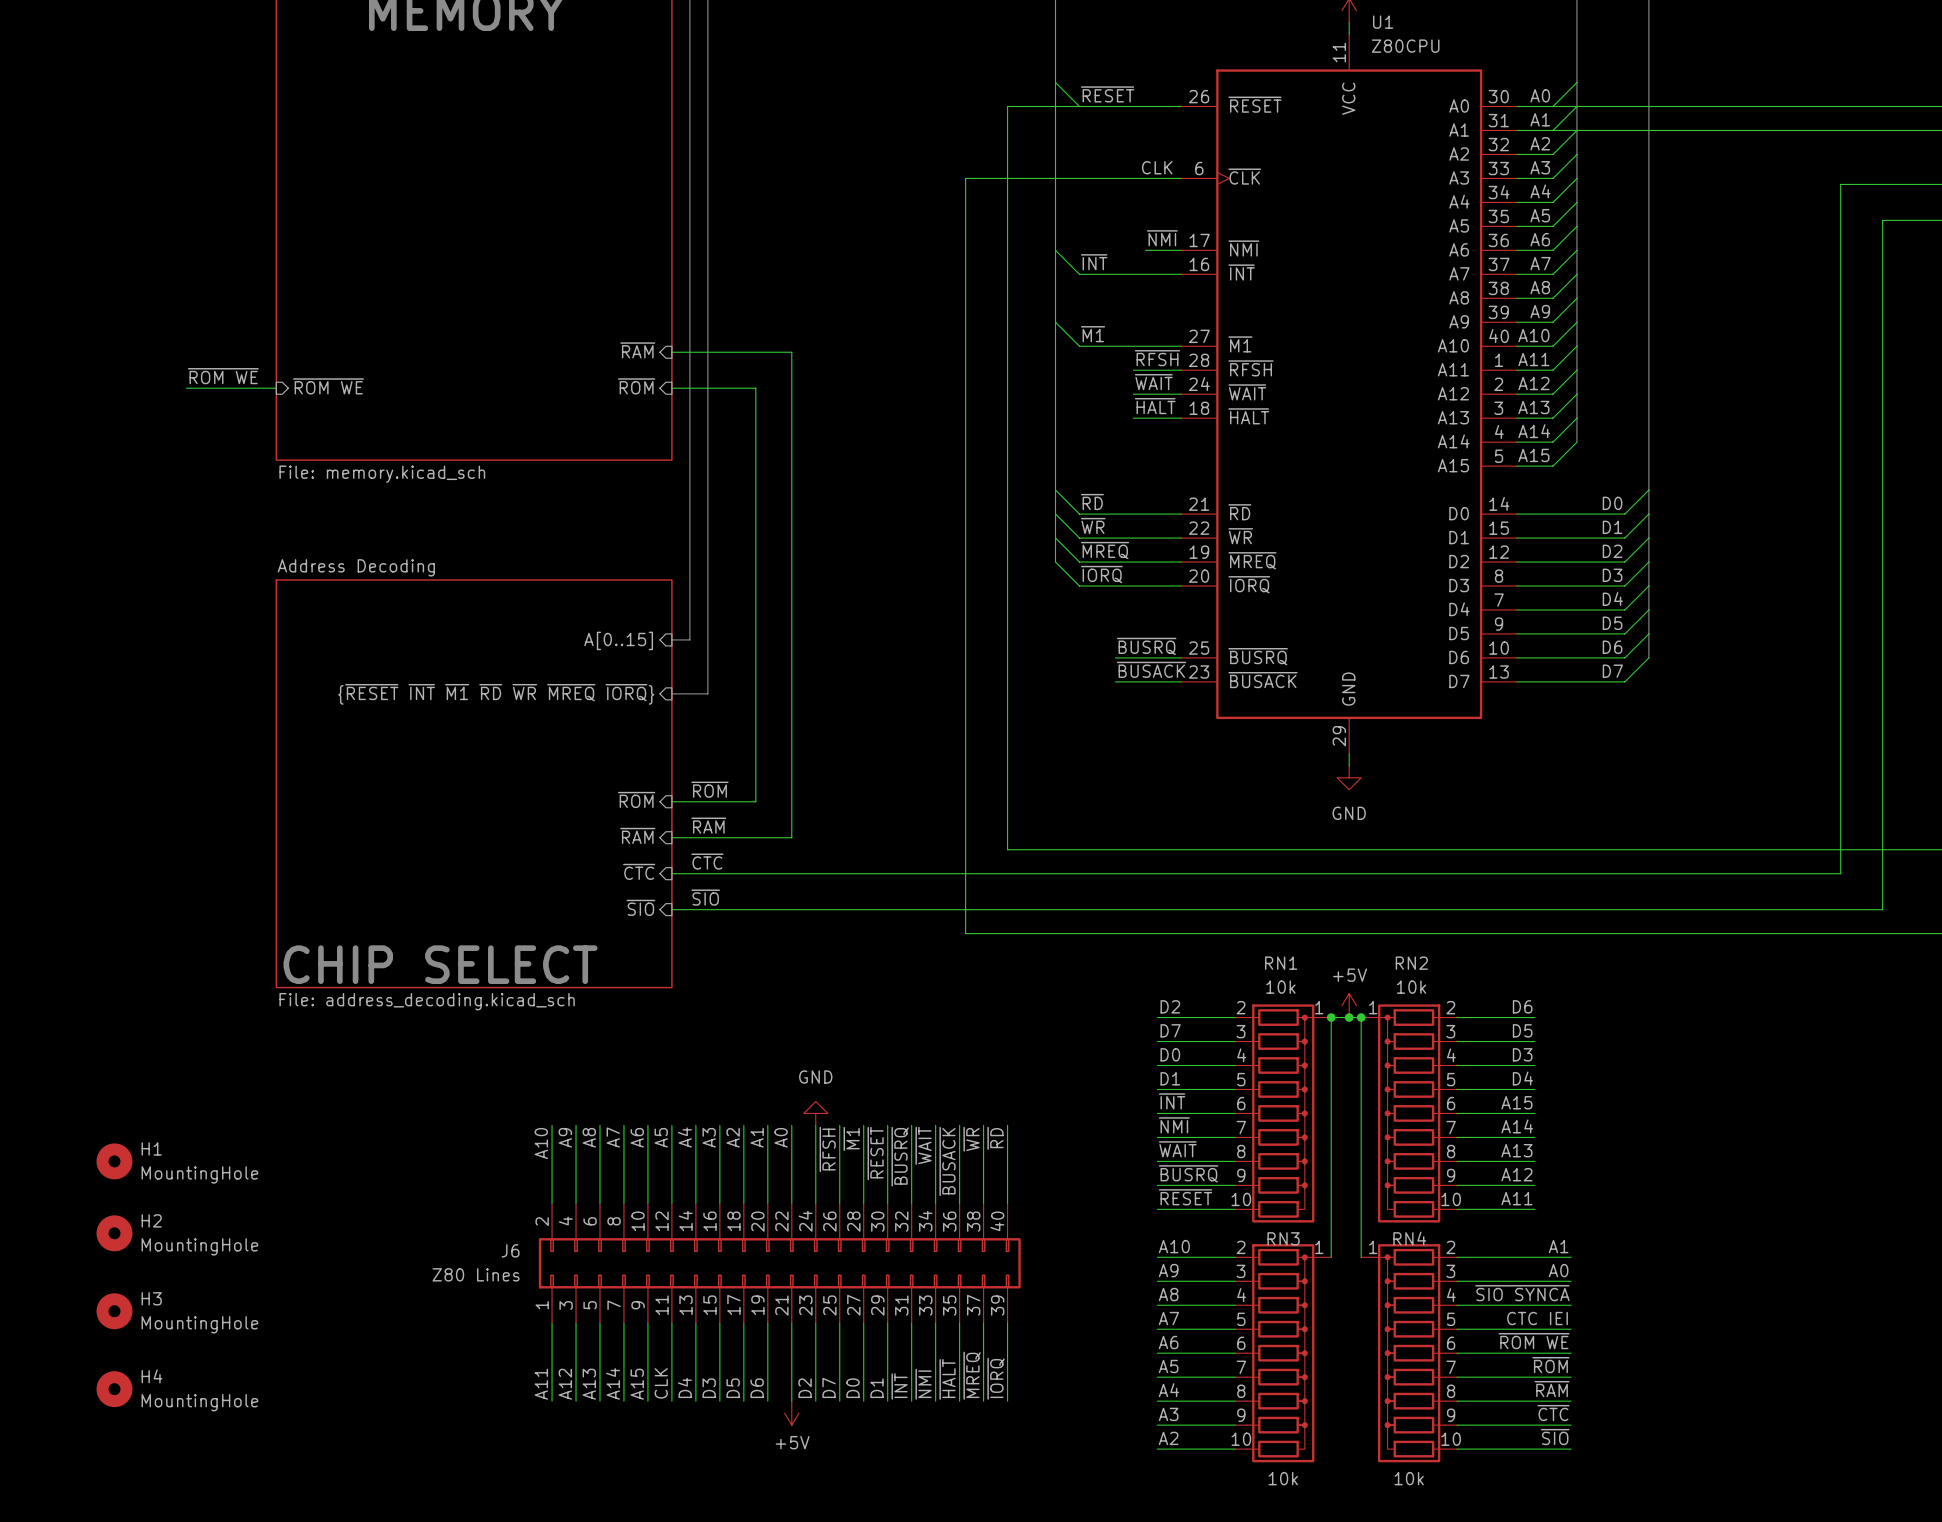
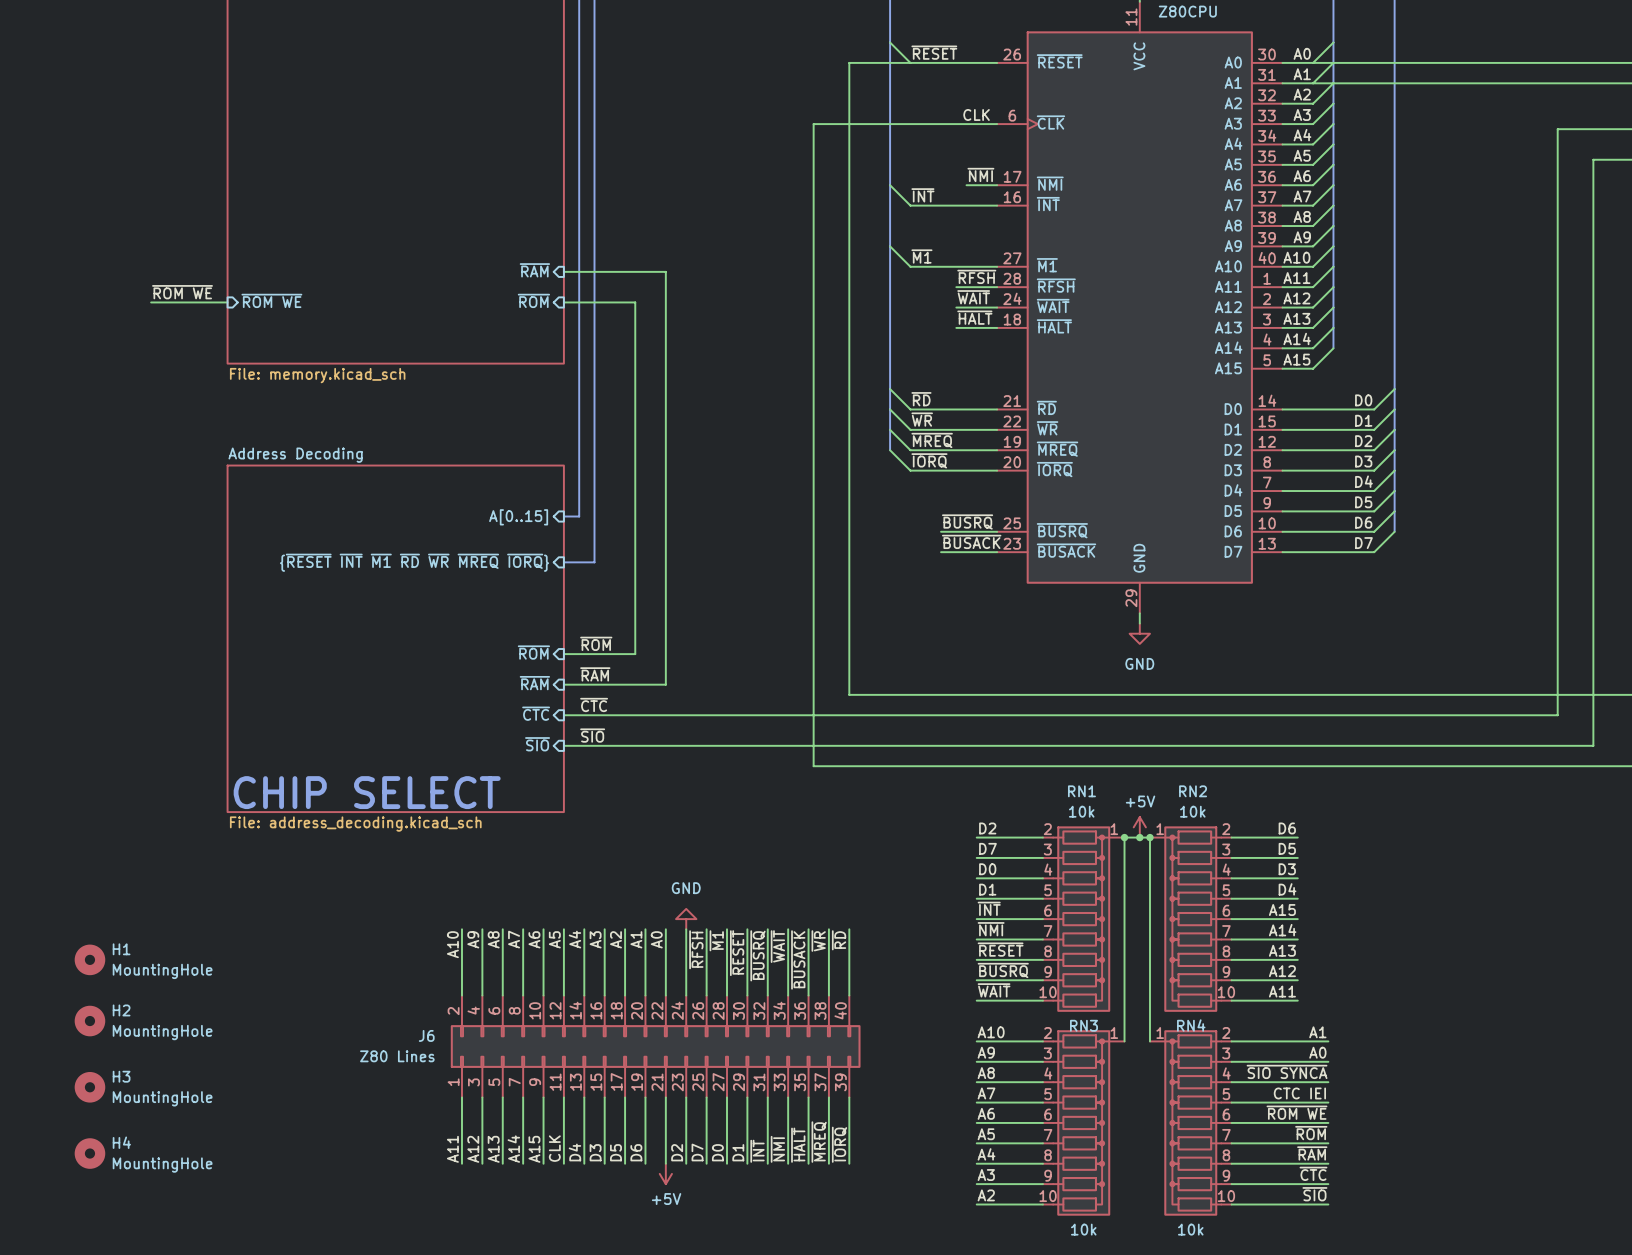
label: ~{WAIT} (1177, 1149) -> ~{RESET} (1000, 949)
label: ~{RESET} (1185, 1197) -> ~{WAIT} (994, 990)

